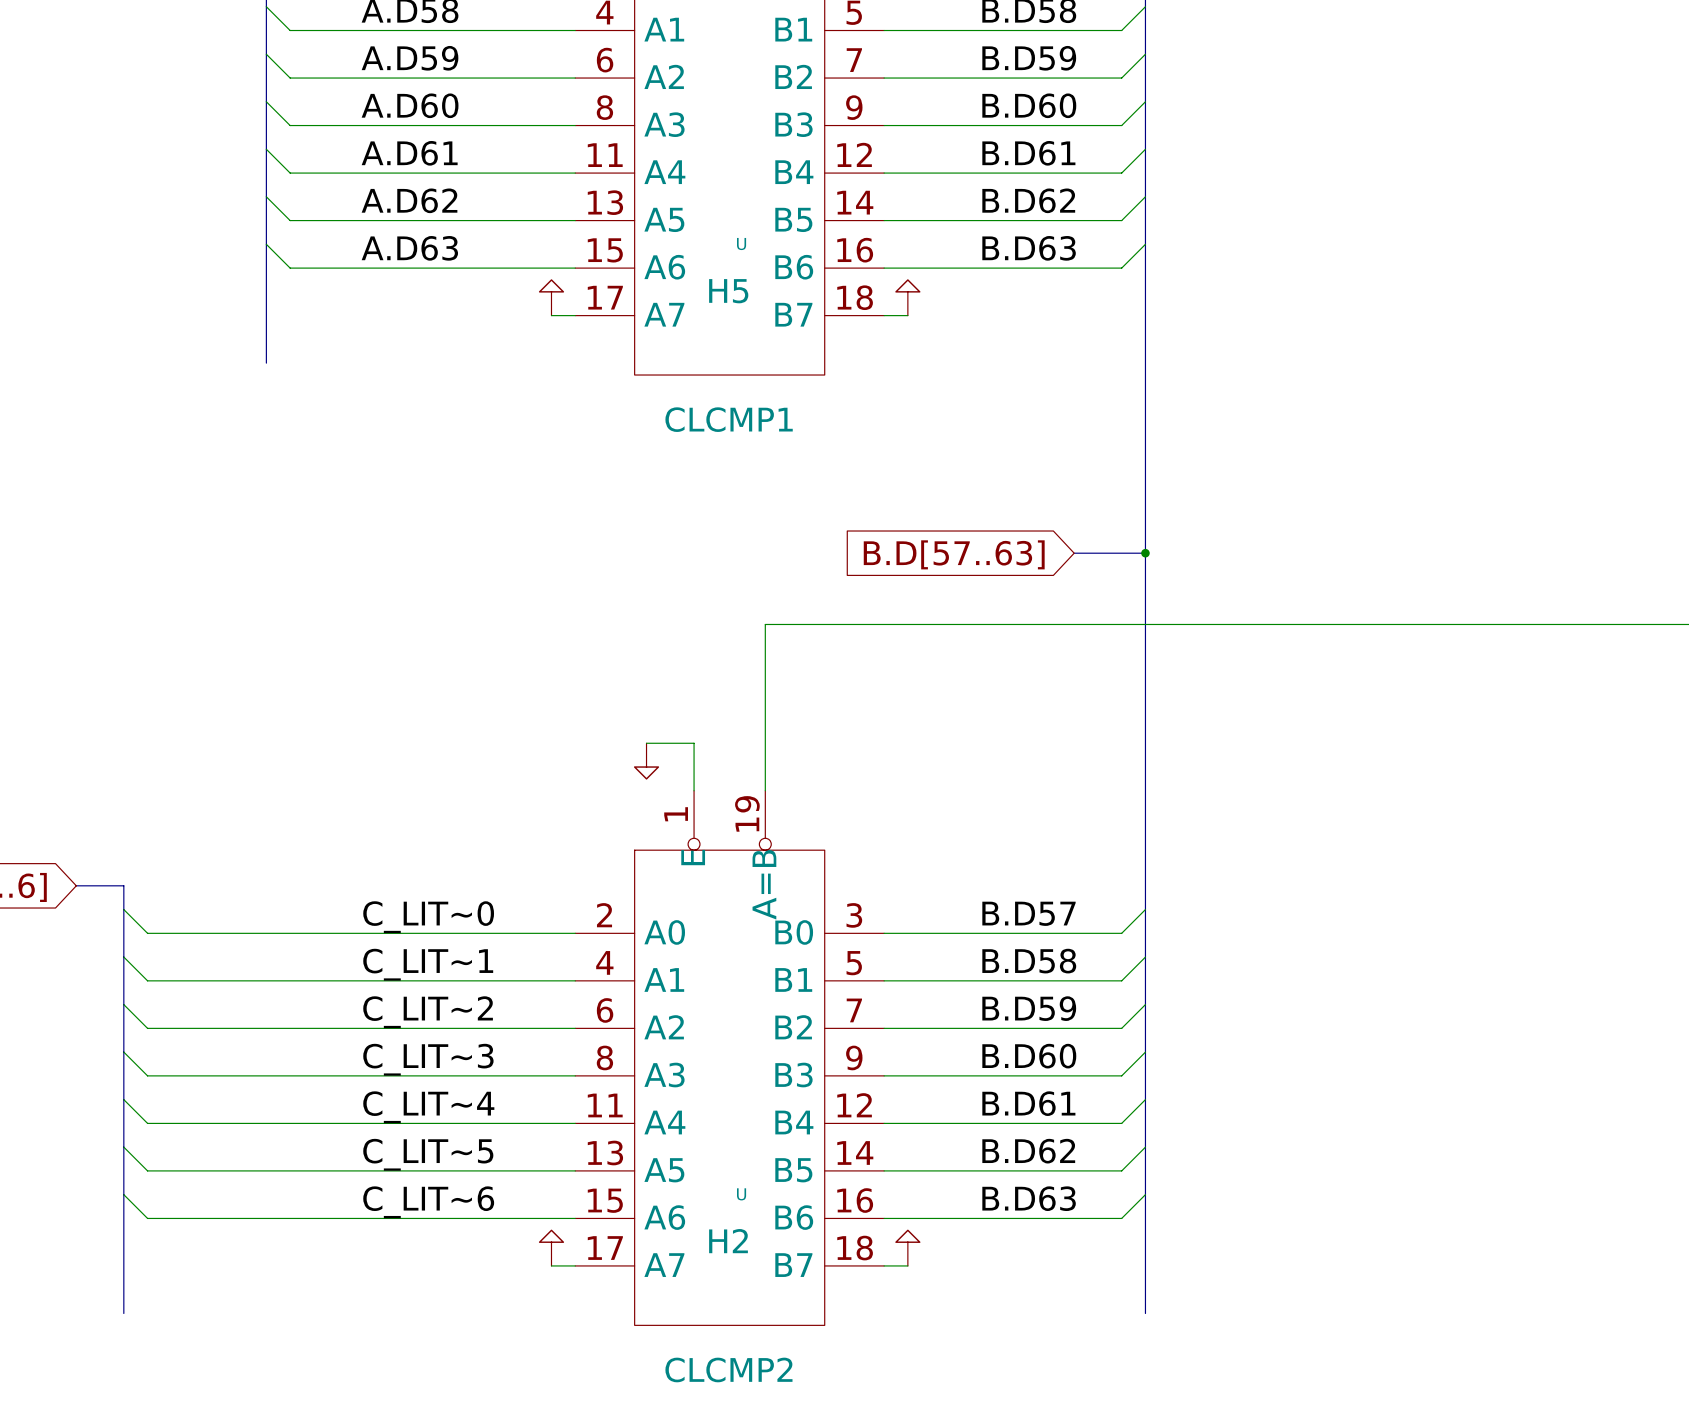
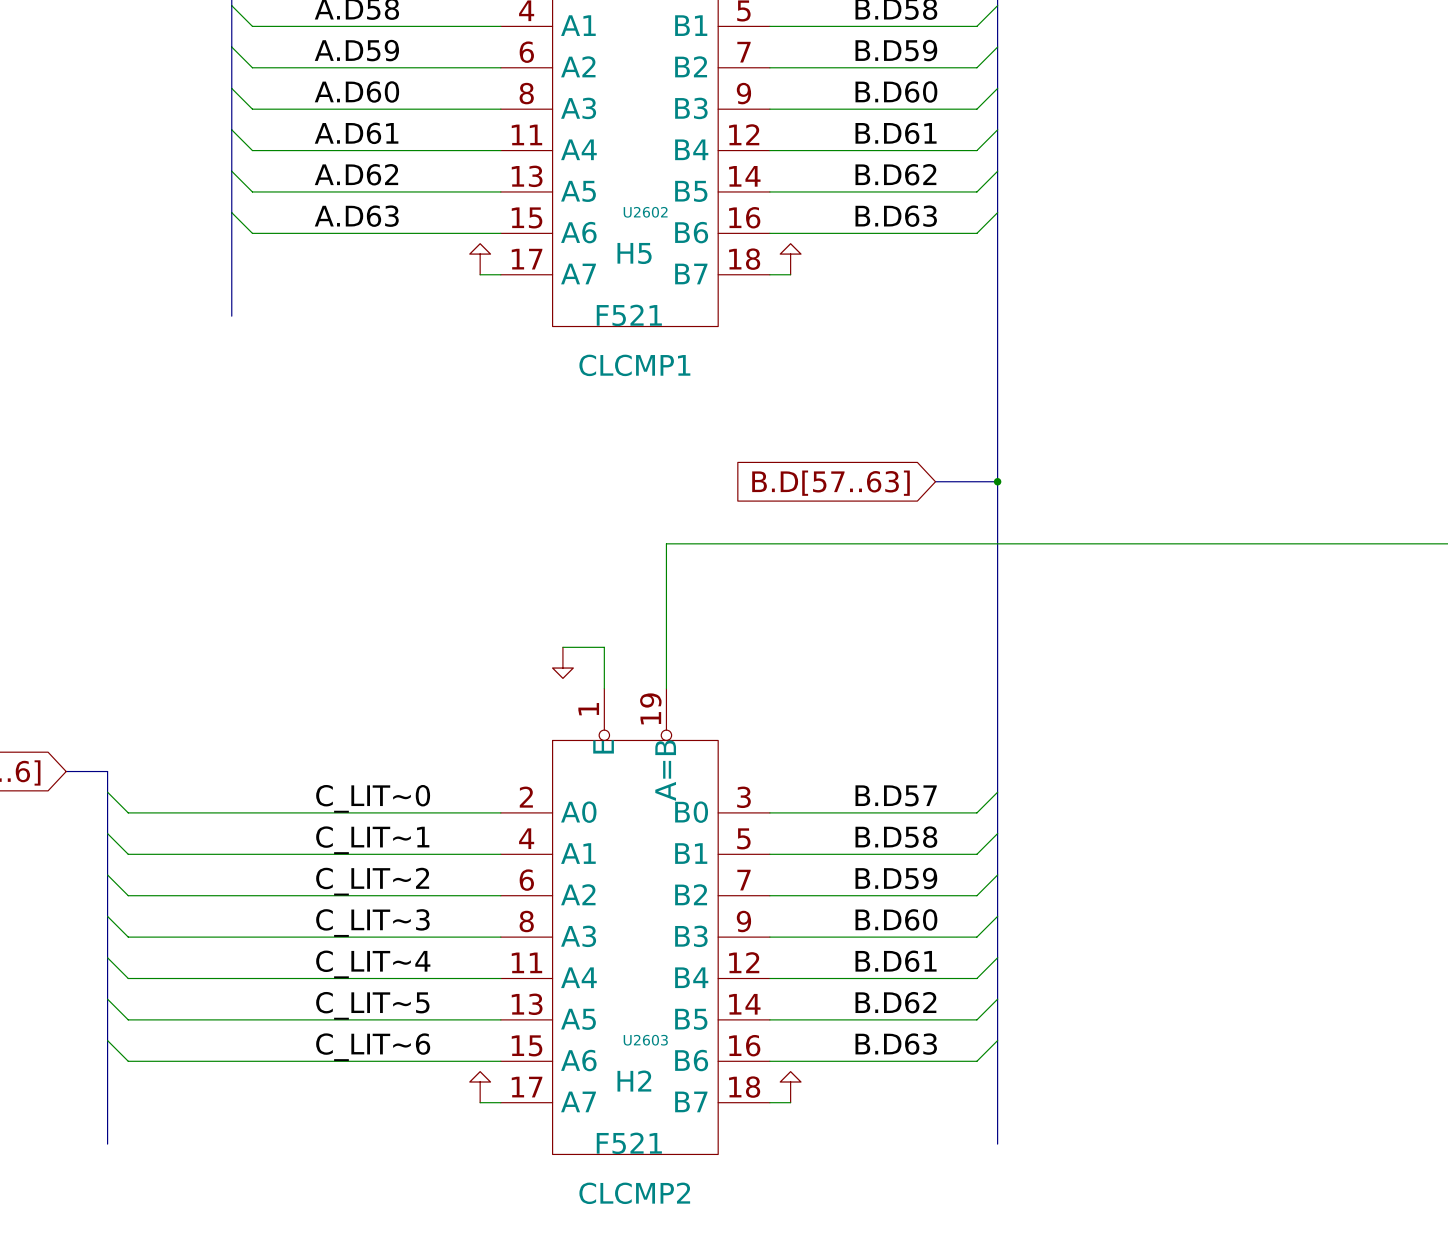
U name: U (741, 244) -> U2602 (645, 212)
U value: none -> F521 (629, 315)
U name: U (741, 1194) -> U2603 (645, 1040)
U value: none -> F521 (629, 1143)

